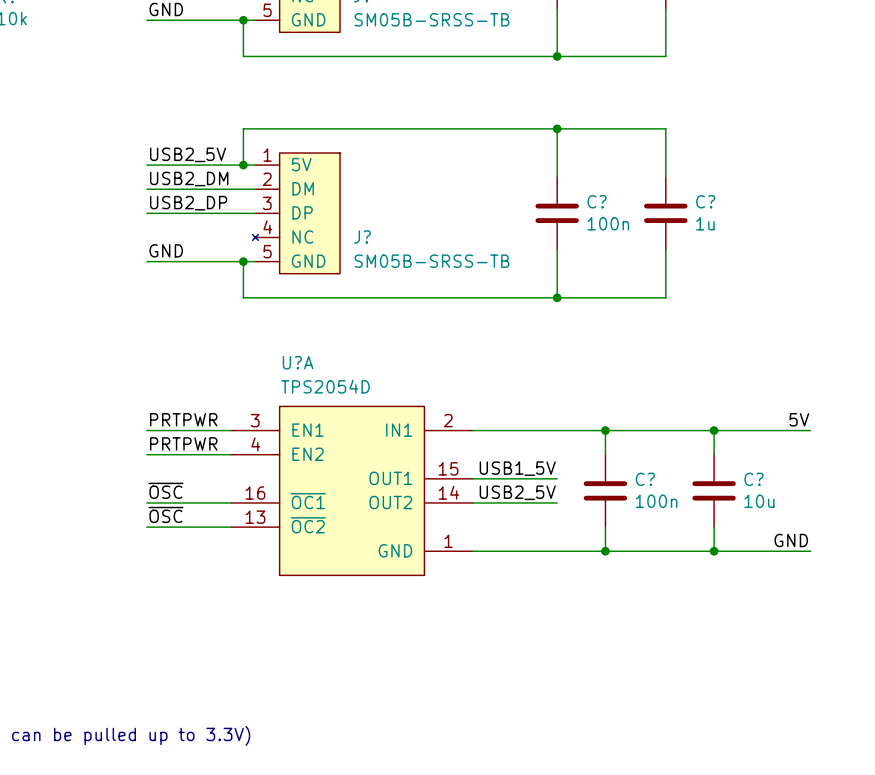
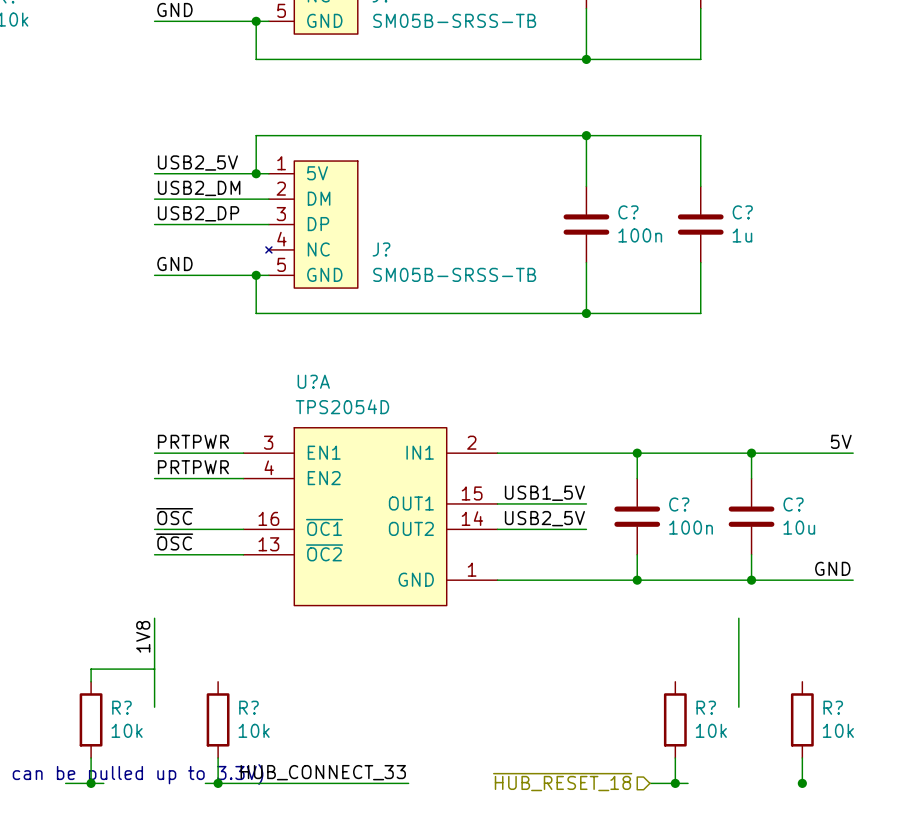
wire: none -> (154, 618) (154, 707)
wire: none -> (738, 618) (738, 707)
label: none -> 1V8 (143, 636)
wire: none -> (154, 669) (91, 669) (91, 681)
R?: none -> 10k (91, 719)
R?: none -> 10k (218, 719)
R?: none -> 10k (675, 719)
R?: none -> 10k (802, 719)
wire: none -> (91, 757) (91, 783)
wire: none -> (218, 757) (218, 783)
wire: none -> (675, 757) (675, 783)
wire: none -> (802, 757) (802, 783)
label: none -> HUB_CONNECT_33 (323, 772)
hierarchical label: none -> ~{HUB_RESET_18} (562, 782)
wire: none -> (65, 783) (103, 783)
junction: none -> (91, 783)
wire: none -> (205, 783) (408, 783)
junction: none -> (218, 783)
wire: none -> (649, 783) (688, 783)
junction: none -> (675, 783)
junction: none -> (802, 783)

